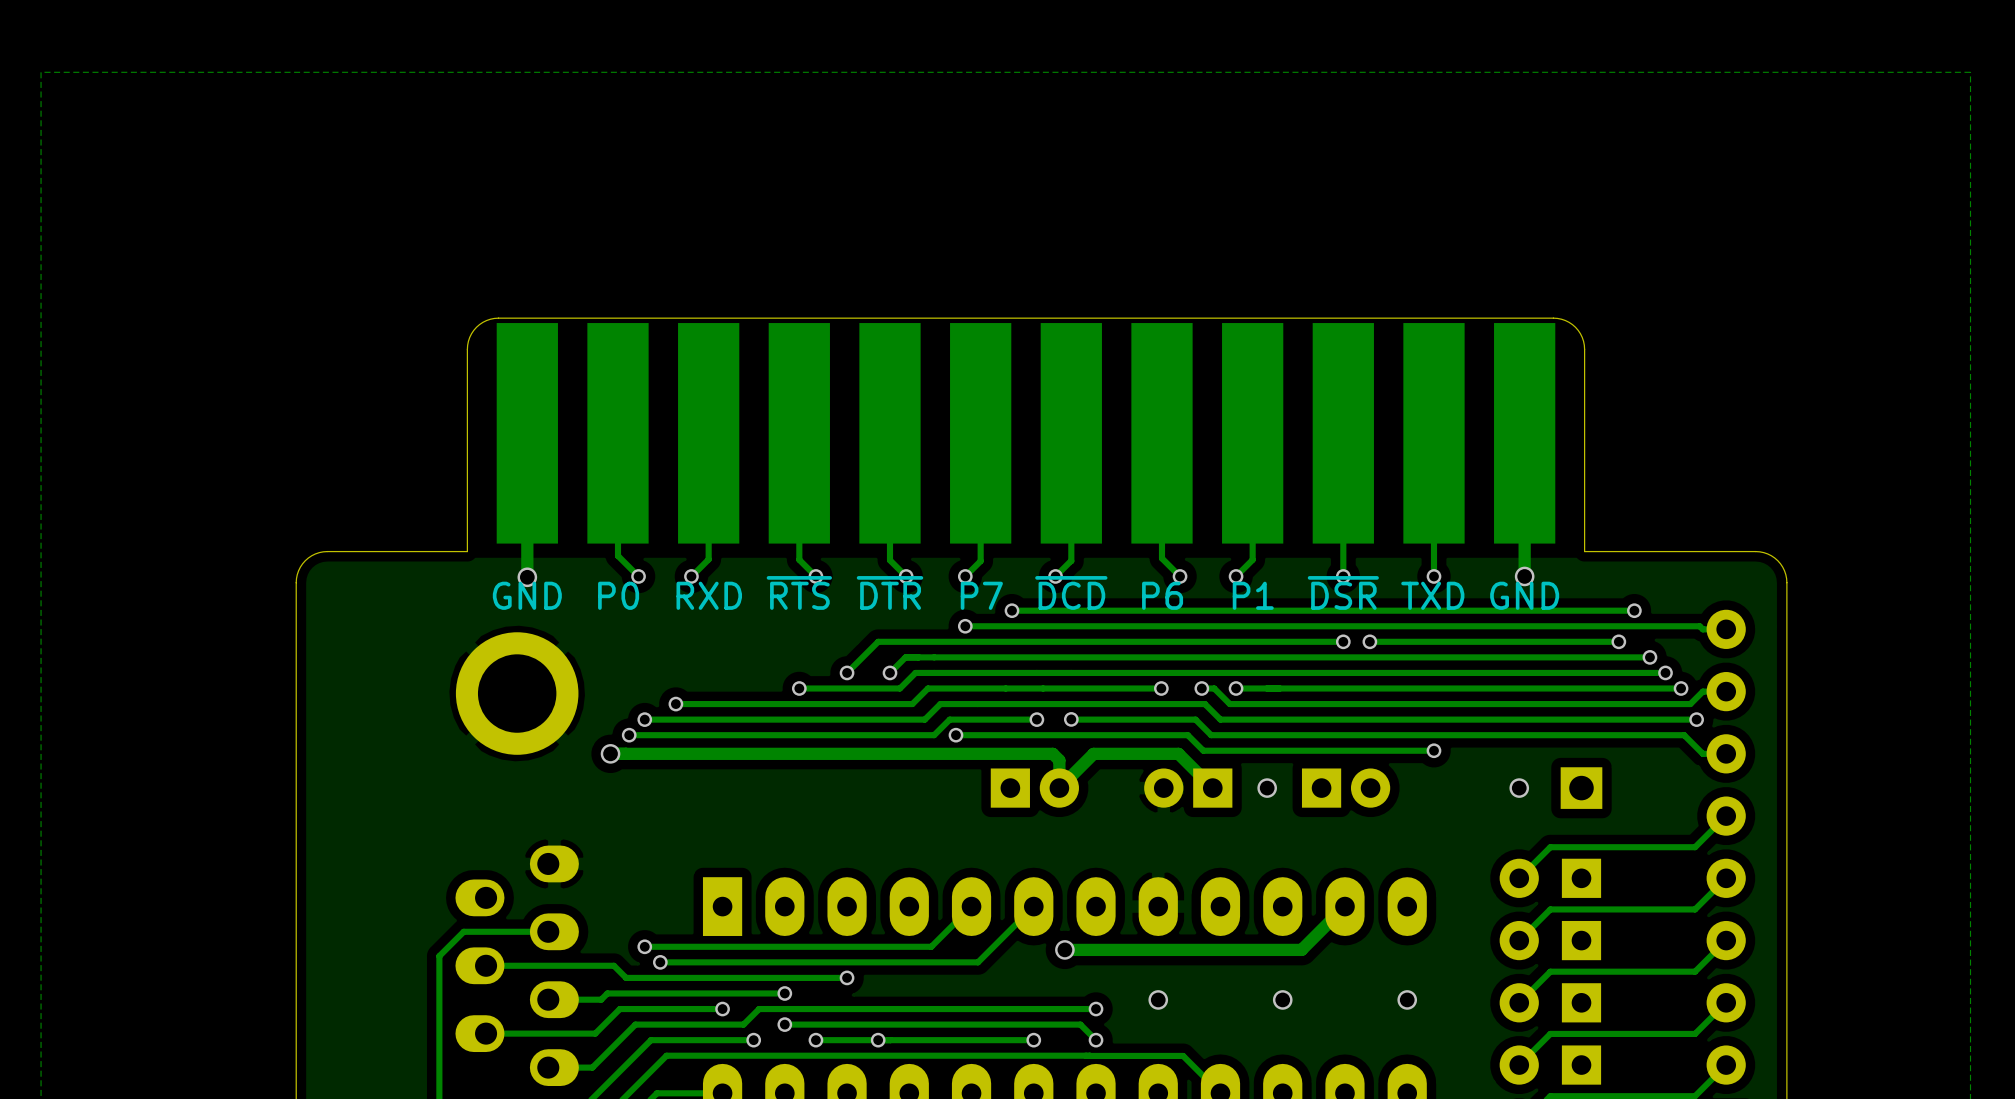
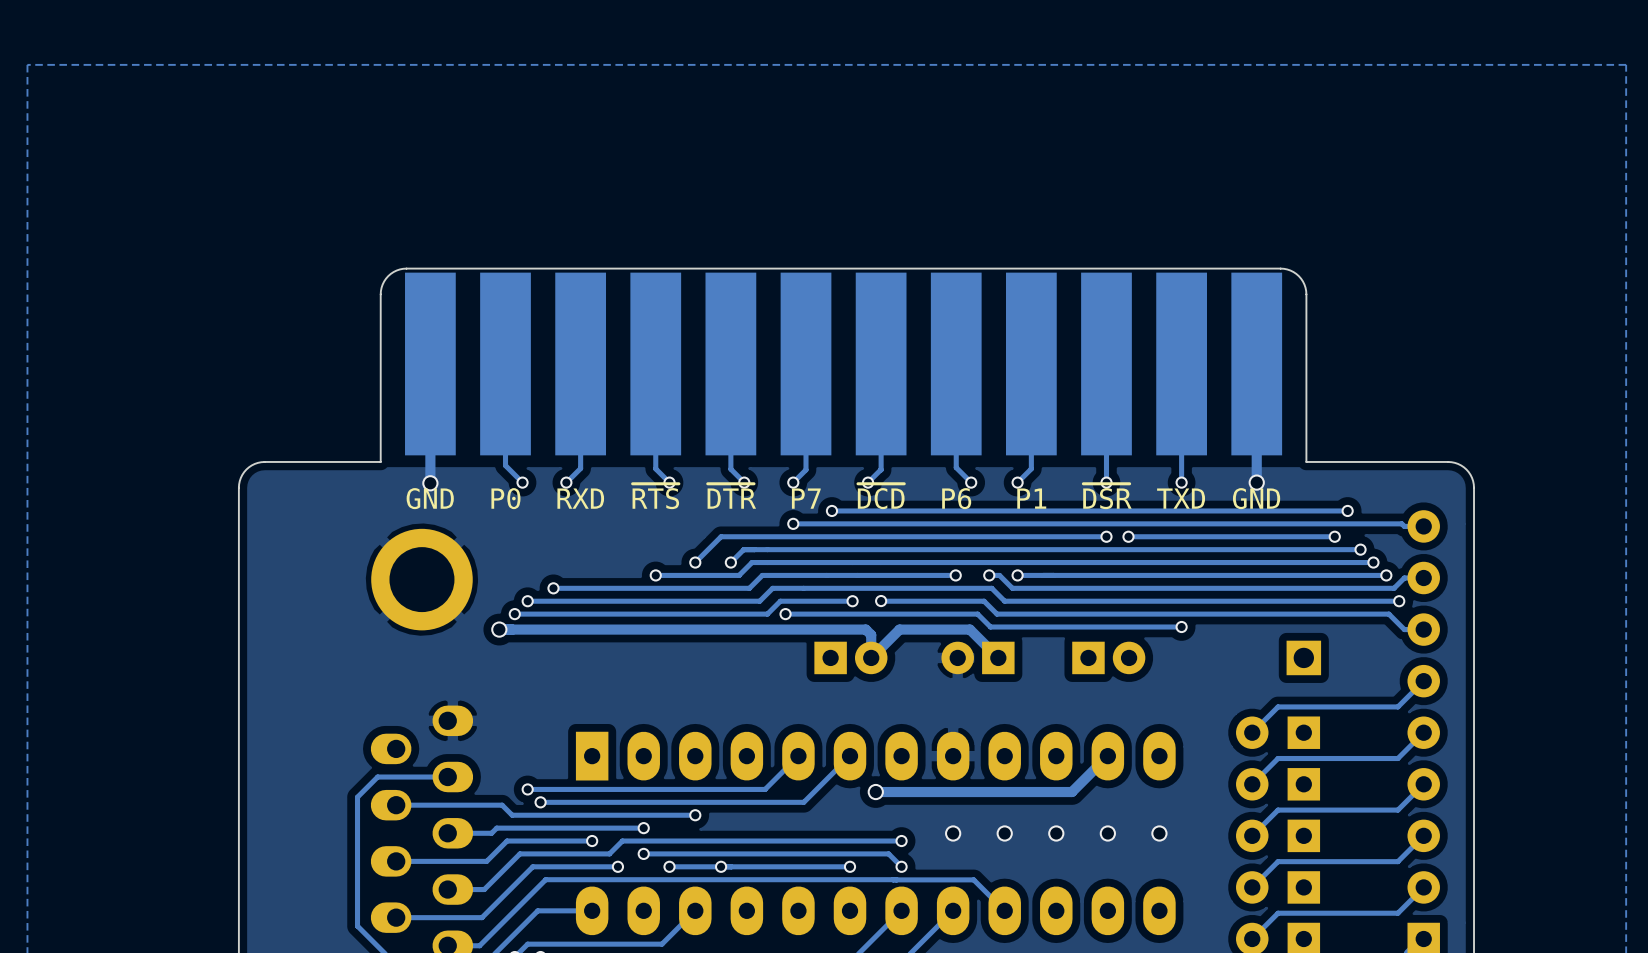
via: (1267, 788) -> none
via: (1519, 788) -> none
via: none -> (1004, 833)
via: none -> (1107, 833)

